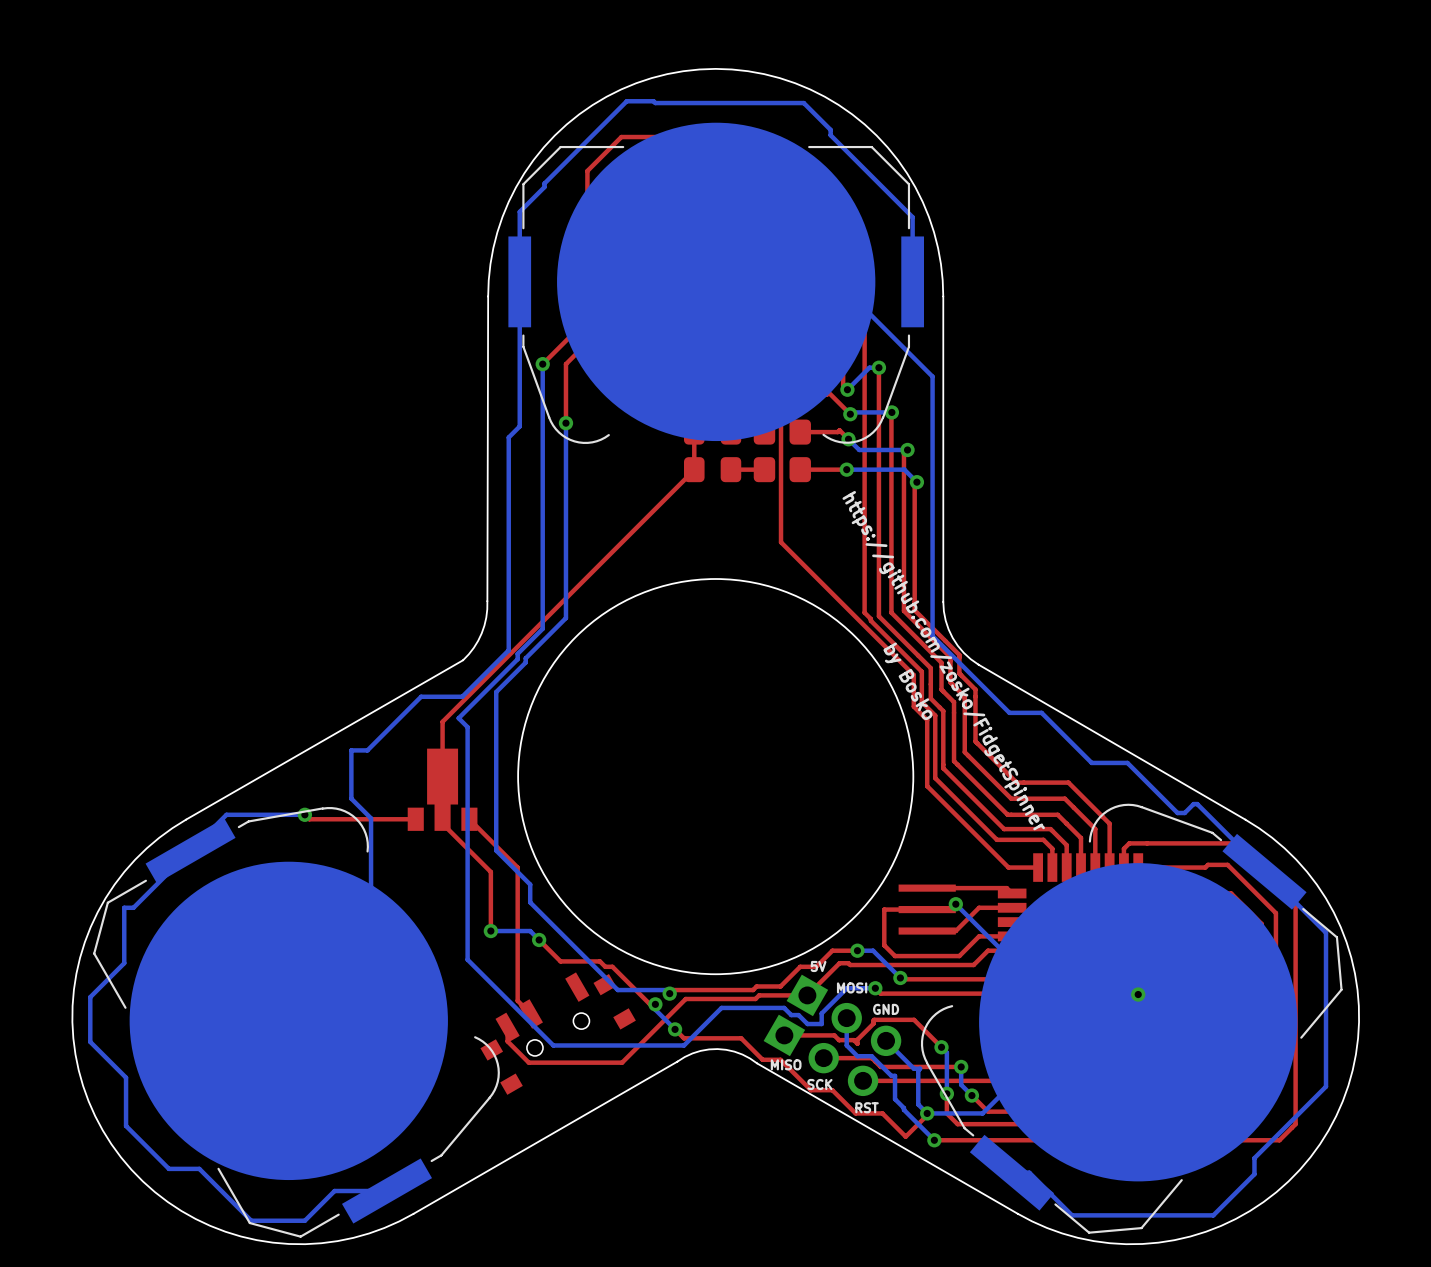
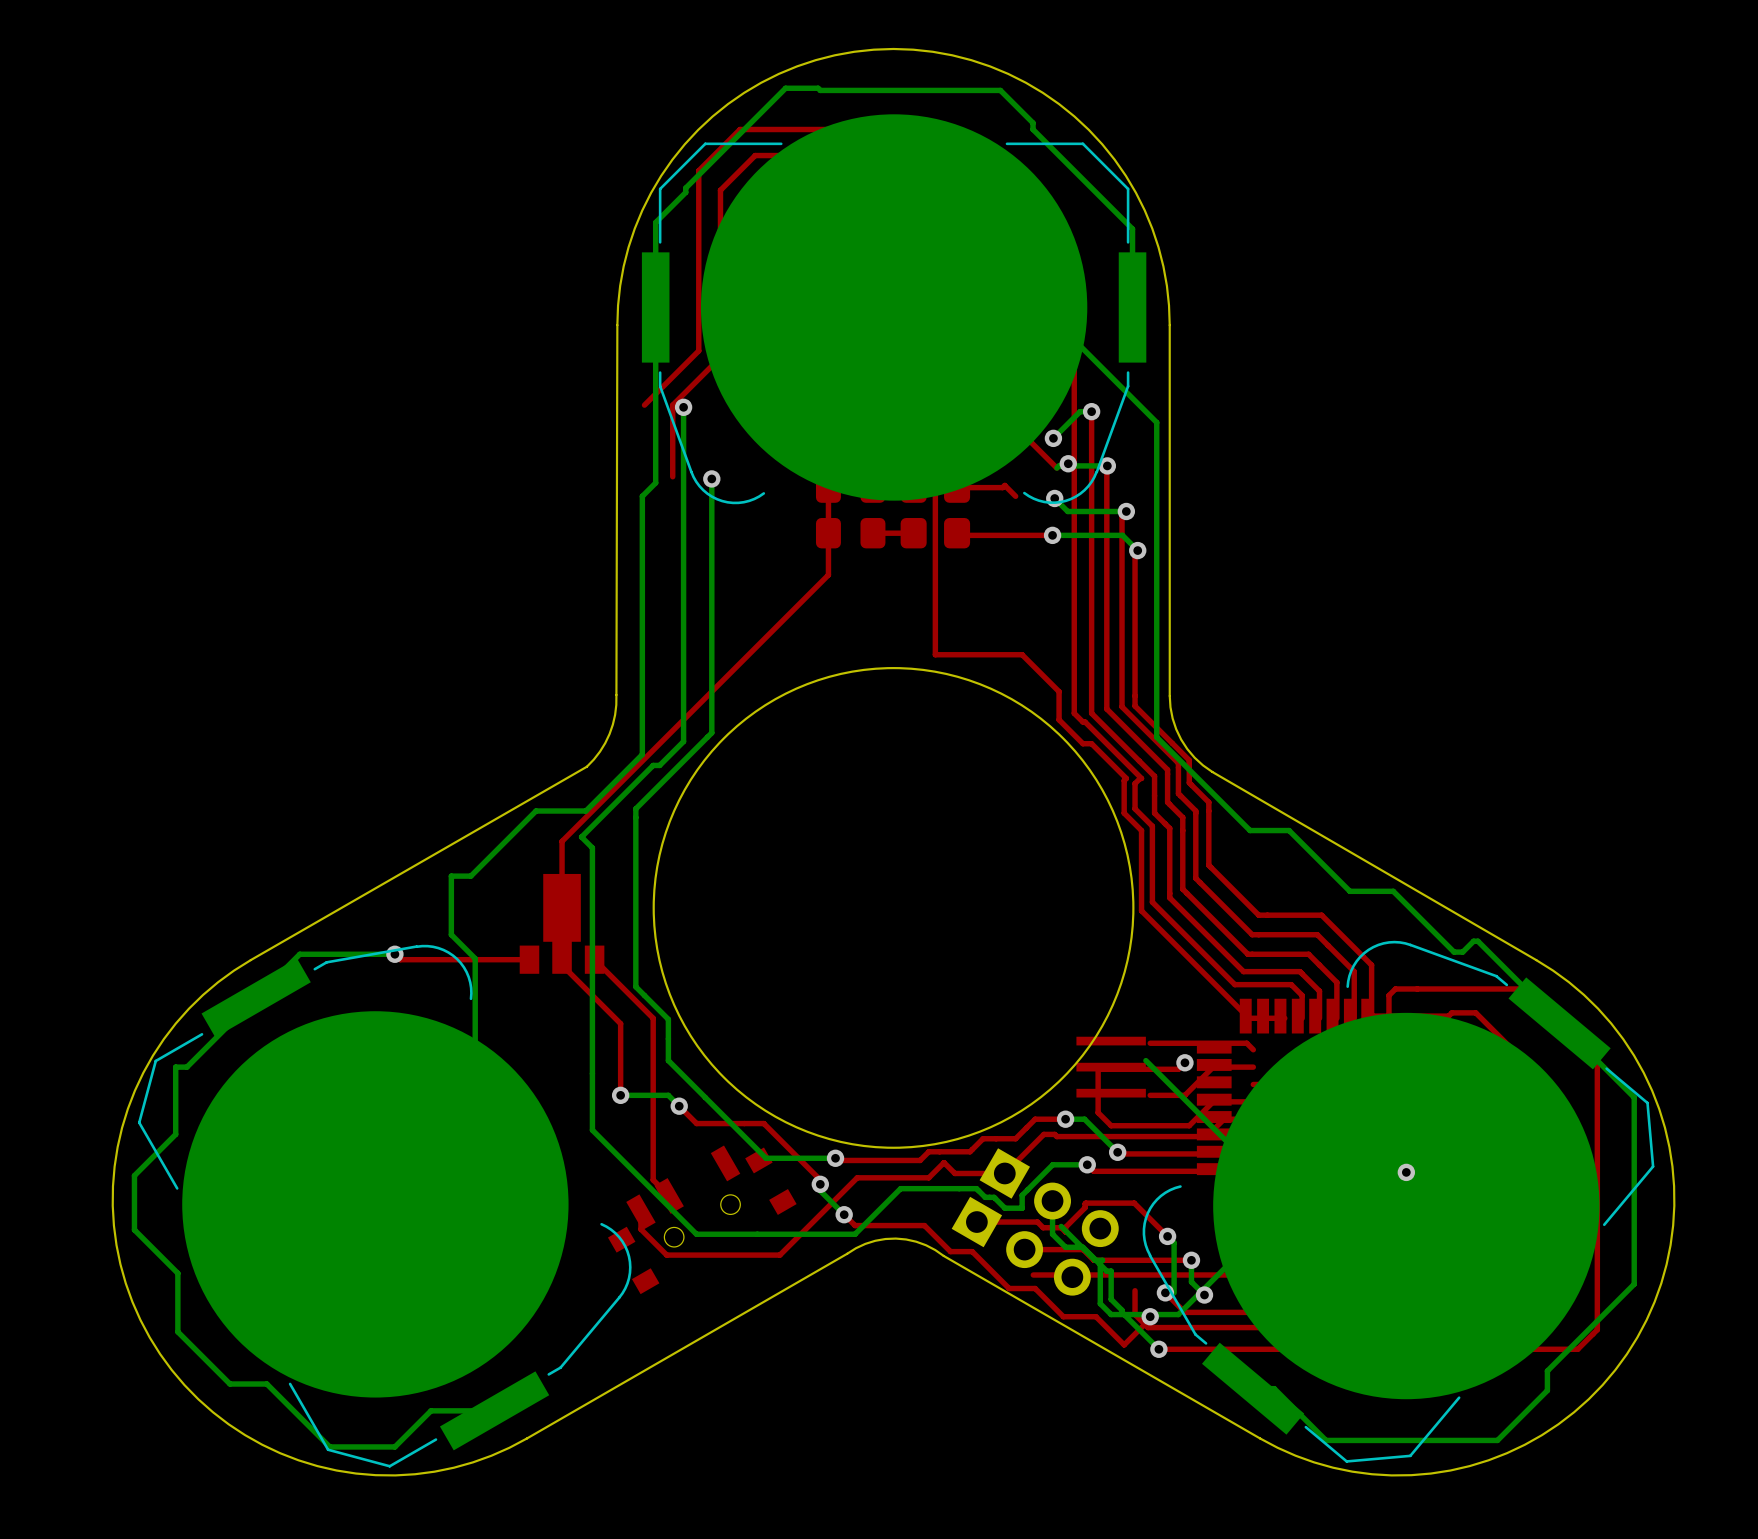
bottom track: (658, 103) (626, 101) (544, 183) (544, 187) (519, 211) (519, 426) (508, 437) (508, 650) (462, 696) (421, 696) (367, 750) (351, 750) (351, 798) (371, 818) (371, 938) (288, 1020) -> (785, 88) (685, 188) (685, 192) (655, 222) (655, 482) (642, 496) (642, 754) (585, 811) (535, 811) (470, 876) (451, 876) (451, 934) (475, 958) (475, 1104) (375, 1204)
bottom track: (685, 103) (803, 103) (830, 129) (830, 135) (912, 217) (912, 281) -> (818, 88) (820, 90) (1000, 90) (1033, 122) (1033, 129) (1132, 229) (1132, 307)
bottom track: (716, 281) (837, 281) (932, 376) (932, 635) (1009, 712) (1041, 712) (1091, 762) (1127, 762) (1177, 813) (1184, 813) (1193, 804) (1197, 804) (1326, 932) (1326, 1086) (1254, 1158) (1254, 1174) (1213, 1215) (1072, 1215) (1029, 1172) (1011, 1172) -> (894, 307) (1041, 307) (1156, 422) (1156, 737) (1250, 830) (1289, 830) (1349, 891) (1393, 891) (1454, 952) (1462, 952) (1473, 941) (1477, 941) (1634, 1097) (1634, 1284) (1547, 1370) (1547, 1390) (1497, 1440) (1326, 1440) (1274, 1388) (1253, 1388)
top track: (785, 281) (781, 285) (781, 542) (913, 675) (913, 706) (927, 720) (927, 786) (1008, 867) (1038, 867) -> (939, 305) (935, 309) (935, 654) (1022, 654) (1059, 691) (1059, 719) (1082, 743) (1091, 743) (1126, 778) (1124, 780) (1124, 813) (1141, 830) (1141, 910) (1248, 1018) (1284, 1018)
part position: (716, 283) -> (894, 309)
board edge: (943, 296) (943, 601) (945, 620) (952, 637) (963, 652) (978, 664) (1245, 819) (1272, 837) (1307, 871) (1325, 898) (1340, 927) (1351, 957) (1357, 989) (1359, 1022) (1355, 1054) (1348, 1085) (1336, 1116) (1320, 1144) (1299, 1169) (1276, 1192) (1249, 1211) (1221, 1225) (1190, 1236) (1142, 1244) (1109, 1243) (1077, 1237) (1046, 1227) (1017, 1213) (750, 1058) (734, 1051) (717, 1049) (700, 1050) (684, 1057) (413, 1213) (384, 1227) (353, 1237) (321, 1243) (289, 1244) (240, 1236) (195, 1218) (167, 1202) (142, 1181) (121, 1157) (102, 1130) (88, 1101) (78, 1070) (73, 1038) (73, 989) (80, 957) (90, 927) (105, 898) (124, 871) (159, 837) (186, 819) (463, 660) (478, 640) (484, 625) (487, 609) (488, 296) (490, 264) (497, 232) (508, 201) (524, 173) (543, 147) (579, 114) (606, 96) (636, 83) (667, 74) (699, 69) (731, 69) (764, 74) (795, 83) (824, 96) (852, 114) (876, 135) (907, 173) (922, 201) (934, 232) (940, 264) (943, 296) -> (1169, 325) (1169, 695) (1172, 718) (1181, 739) (1194, 757) (1212, 771) (1536, 960) (1568, 982) (1598, 1008) (1623, 1039) (1652, 1090) (1665, 1127) (1672, 1166) (1674, 1205) (1670, 1245) (1661, 1283) (1646, 1319) (1626, 1354) (1602, 1385) (1574, 1412) (1541, 1435) (1506, 1453) (1469, 1466) (1411, 1475) (1371, 1474) (1333, 1467) (1295, 1455) (1260, 1438) (935, 1250) (916, 1241) (895, 1238) (875, 1240) (855, 1248) (526, 1438) (491, 1455) (453, 1467) (415, 1474) (375, 1475) (317, 1466) (280, 1453) (245, 1435) (198, 1399) (171, 1370) (149, 1337) (125, 1283) (116, 1245) (112, 1205) (114, 1166) (122, 1127) (134, 1090) (163, 1039) (188, 1008) (218, 982) (250, 960) (586, 766) (605, 743) (612, 724) (616, 704) (617, 325) (620, 285) (628, 247) (642, 210) (661, 175) (684, 144) (712, 116) (744, 92) (797, 66) (834, 55) (873, 49) (913, 49) (952, 55) (990, 66) (1025, 82) (1059, 104) (1088, 129) (1114, 159) (1144, 210) (1158, 247) (1166, 285) (1169, 325)
top track: (800, 319) (802, 317) (861, 317) (864, 321) (864, 612) (921, 671) (921, 702) (935, 715) (935, 778) (996, 839) (1043, 839) (1052, 848) (1052, 867) -> none
bottom track: (542, 364) (542, 628) (517, 653) (517, 659) (458, 718) (467, 727) (467, 959) (553, 1045) (684, 1045) (721, 1007) (784, 1007) (791, 1015) (798, 1015) (807, 1024) (821, 1024) (821, 1013) (846, 988) (875, 988) -> none
via: (542, 364) -> none
bottom track: none -> (683, 407) (683, 741) (659, 765) (653, 765) (581, 837) (592, 847) (592, 1130) (696, 1234) (855, 1234) (900, 1188) (976, 1188) (985, 1197) (994, 1197) (1004, 1208) (1022, 1208) (1022, 1195) (1052, 1164) (1087, 1164)
via: none -> (683, 407)
top track: (878, 367) (878, 616) (930, 668) (930, 698) (943, 711) (943, 768) (1004, 829) (1050, 829) (1066, 845) (1066, 867) -> none
bottom track: (878, 367) (869, 367) (847, 389) -> (1091, 411) (1080, 411) (1053, 438)
via: (878, 367) -> none
via: none -> (1091, 411)
via: (847, 389) -> none
via: none -> (1053, 438)
top track: (827, 394) (828, 392) (850, 414) -> (989, 442) (1030, 442) (1056, 468)
top track: (891, 412) (891, 612) (896, 618) -> (957, 350) (1069, 350) (1074, 355) (1074, 713)
bottom track: (891, 412) (852, 412) (850, 414) -> (1107, 465) (1059, 465) (1056, 468)
via: (850, 414) -> none
top track: none -> (1107, 465) (1106, 709) (1167, 769) (1167, 802) (1182, 817) (1182, 889) (1247, 954) (1308, 954) (1336, 982) (1336, 1018)
via: none -> (1107, 465)
bottom track: (565, 423) (565, 618) (525, 658) (525, 662) (496, 692) (496, 850) (530, 884) (530, 902) (617, 990) (666, 990) (669, 993) -> none
via: (565, 423) -> none
bottom track: none -> (711, 478) (711, 732) (635, 808) (635, 986) (668, 1019) (668, 1060) (766, 1158) (835, 1158)
via: none -> (711, 478)
bottom track: (848, 439) (859, 449) (907, 449) -> (1054, 498) (1067, 511) (1126, 511)
via: (848, 439) -> none
via: none -> (1054, 498)
top track: (907, 449) (903, 453) (903, 610) (911, 618) -> (1091, 411) (1091, 713)
via: (907, 449) -> none
top track: none -> (1126, 511) (1122, 515) (1122, 706) (1178, 763) (1178, 793) (1195, 811) (1195, 878) (1252, 934) (1317, 934) (1354, 971) (1354, 1018)
via: none -> (1126, 511)
top track: (846, 469) (800, 469) -> (1052, 535) (959, 535) (957, 533)
bottom track: (846, 469) (904, 469) (916, 482) -> (1052, 535) (1122, 535) (1137, 550)
via: (846, 469) -> none
top track: (694, 470) (442, 721) (442, 823) (490, 872) (490, 931) -> (828, 533) (828, 574) (562, 841) (562, 965) (620, 1023) (620, 1095)
via: none -> (1052, 535)
top track: (916, 482) (914, 484) (914, 610) (959, 655) (959, 673) (975, 689) (975, 712) -> (1139, 761) (1154, 776) (1154, 813) (1169, 828)
via: (916, 482) -> none
top track: none -> (1137, 550) (1135, 553) (1135, 706) (1189, 760) (1189, 782) (1208, 802) (1208, 865) (1258, 915) (1321, 915) (1371, 965) (1371, 1018)
via: none -> (1137, 550)
top track: (903, 625) (941, 662) (941, 689) (954, 702) (954, 761) (1007, 814) (1057, 814) (1081, 838) (1081, 867) -> (1082, 722) (1085, 722) (1141, 778) (1135, 783) (1135, 808) (1152, 826) (1152, 902) (1234, 984) (1291, 984) (1302, 995) (1302, 1018)
top track: (950, 657) (950, 682) (964, 696) (964, 752) (1011, 798) (1064, 798) (1095, 829) (1095, 867) -> none
text: https://github.com/zosko/FidgetSpinner (943, 660) -> none
text: by Bosko (907, 681) -> none
top track: (975, 741) (1016, 782) (1068, 782) (1109, 823) (1109, 867) -> (1169, 863) (1169, 897) (1243, 971) (1299, 971) (1319, 991) (1319, 1018)
round board edge position: (715, 776) -> (893, 907)
part position: (442, 789) -> (562, 923)
top track: (304, 814) (309, 819) (415, 819) -> (394, 954) (400, 959) (529, 959)
bottom track: (304, 814) (226, 814) (133, 907) (124, 907) (124, 963) (90, 997) (90, 1041) (126, 1077) (126, 1125) (168, 1168) (199, 1168) -> (394, 954) (299, 954) (186, 1067) (175, 1067) (175, 1134) (134, 1175) (134, 1229) (177, 1273) (177, 1331) (227, 1381)
via position: (304, 814) -> (394, 954)
top track: (469, 819) (517, 867) (517, 1000) (530, 1013) -> (594, 959) (653, 1018) (653, 1180) (669, 1195)
top track: (1123, 867) (1123, 848) (1129, 843) (1233, 843) (1295, 906) (1295, 1124) (1279, 1140) (934, 1140) -> (1388, 1018) (1388, 995) (1395, 988) (1521, 988) (1597, 1064) (1597, 1329) (1577, 1349) (1158, 1349)
top track: (927, 888) (1006, 888) (1012, 893) -> (1150, 1043) (1246, 1043) (1253, 1049)
top track: (955, 904) (950, 909) (884, 909) (884, 945) (895, 956) (959, 956) (979, 936) (1012, 936) -> (1184, 1062) (1178, 1069) (1098, 1069) (1098, 1112) (1111, 1125) (1189, 1125) (1213, 1101) (1253, 1101)
via position: (955, 904) -> (1184, 1062)
top track: (1012, 907) (979, 907) (955, 931) (927, 931) -> (1253, 1067) (1213, 1067) (1184, 1095) (1150, 1095)
top track: (1012, 922) (1039, 922) (1043, 925) (1043, 950) (988, 950) (973, 965) (880, 965) -> (1253, 1084) (1286, 1084) (1291, 1088) (1291, 1119) (1224, 1119) (1206, 1136) (1056, 1136) (1054, 1134)
bottom track: (490, 931) (530, 931) (539, 939) -> (620, 1095) (668, 1095) (679, 1106)
via: (490, 931) -> none
via: none -> (620, 1095)
top track: (539, 939) (560, 961) (599, 961) (605, 966) (612, 966) (650, 1004) (655, 1004) -> none
via: (539, 939) -> none
top track: none -> (679, 1106) (696, 1123) (763, 1123) (820, 1179) (820, 1184)
via: none -> (679, 1106)
top track: (857, 950) (832, 950) (816, 966) (800, 966) (780, 986) (769, 986) -> (1065, 1119) (1035, 1119) (1015, 1138) (983, 1138) (970, 1151) (928, 1151) (920, 1160)
bottom track: (857, 950) (873, 950) (900, 977) -> (1065, 1119) (1084, 1119) (1117, 1152)
via: (857, 950) -> none
via: none -> (1065, 1119)
top track: (871, 965) (839, 963) (807, 995) (759, 995) (755, 998) (685, 998) (622, 1062) (528, 1062) (507, 1041) (507, 1027) -> (1043, 1134) (1004, 1173) (954, 1173) (944, 1162) (928, 1177) (857, 1177) (779, 1255) (666, 1255) (640, 1229) (640, 1212)
text: 5V (818, 966) -> none
top track: (900, 977) (1012, 979) -> (1117, 1152) (1119, 1153) (1253, 1153)
via position: (900, 977) -> (1087, 1164)
via: none -> (1117, 1152)
via: none -> (835, 1158)
top track: (756, 986) (753, 990) (673, 990) (669, 993) -> (904, 1160) (837, 1160) (835, 1158)
text: MOSI (852, 987) -> none
top track: (875, 988) (880, 993) (1012, 993) -> (1087, 1164) (1093, 1171) (1253, 1171)
via: (875, 988) -> none
via: (669, 993) -> none
via position: (1138, 994) -> (1406, 1172)
bottom track: (655, 1004) (655, 1009) (675, 1029) -> (820, 1184) (820, 1190) (844, 1214)
via: (655, 1004) -> none
via: none -> (820, 1184)
text: GND (886, 1009) -> none
part: (843, 1015) -> none
part: none -> (1049, 1197)
bottom track: (846, 1018) (846, 1045) (857, 1056) (871, 1056) (891, 1075) (895, 1075) (895, 1099) (934, 1140) -> (1052, 1201) (1052, 1234) (1065, 1247) (1082, 1247) (1106, 1271) (1111, 1271) (1111, 1299) (1158, 1349)
part position: (1131, 1018) -> (1398, 1201)
part position: (296, 1022) -> (384, 1206)
top track: (675, 1029) (684, 1038) (741, 1038) (762, 1059) (780, 1059) (810, 1090) (832, 1090) (855, 1113) (882, 1113) (905, 1136) (927, 1113) -> (844, 1214) (855, 1225) (924, 1225) (950, 1251) (972, 1251) (1009, 1288) (1035, 1288) (1063, 1316) (1095, 1316) (1124, 1344) (1150, 1316)
via: (675, 1029) -> none
via: none -> (844, 1214)
part position: (558, 1033) -> (702, 1219)
top track: (784, 1035) (834, 1035) (839, 1040) (853, 1040) (857, 1043) (857, 1039) (873, 1023) (874, 1019) (914, 1019) (941, 1047) -> (976, 1222) (1037, 1222) (1043, 1227) (1061, 1227) (1065, 1232) (1065, 1227) (1085, 1207) (1085, 1203) (1134, 1203) (1167, 1236)
bottom track: (941, 1047) (946, 1052) (946, 1093) -> (1167, 1236) (1174, 1242) (1174, 1292)
via: (941, 1047) -> none
via: none -> (1167, 1236)
part: (820, 1055) -> none
part: none -> (1021, 1246)
top track: (823, 1058) (871, 1058) (880, 1066) (961, 1066) -> (1024, 1249) (1083, 1249) (1093, 1260) (1191, 1260)
text: MISO (786, 1064) -> none
bottom track: (961, 1066) (961, 1084) (971, 1095) -> (1191, 1260) (1191, 1282) (1204, 1295)
via: (961, 1066) -> none
via: none -> (1191, 1260)
text: SCK (819, 1084) -> none
via: (946, 1093) -> none
via: none -> (1204, 1295)
text: RST (867, 1107) -> none
via: (927, 1113) -> none
via: none -> (1150, 1316)
via: (934, 1140) -> none
via: none -> (1158, 1349)
bottom track: (201, 1170) (251, 1220) (304, 1220) (334, 1191) (387, 1191) -> (229, 1384) (266, 1384) (329, 1446) (394, 1446) (431, 1410) (494, 1410)

